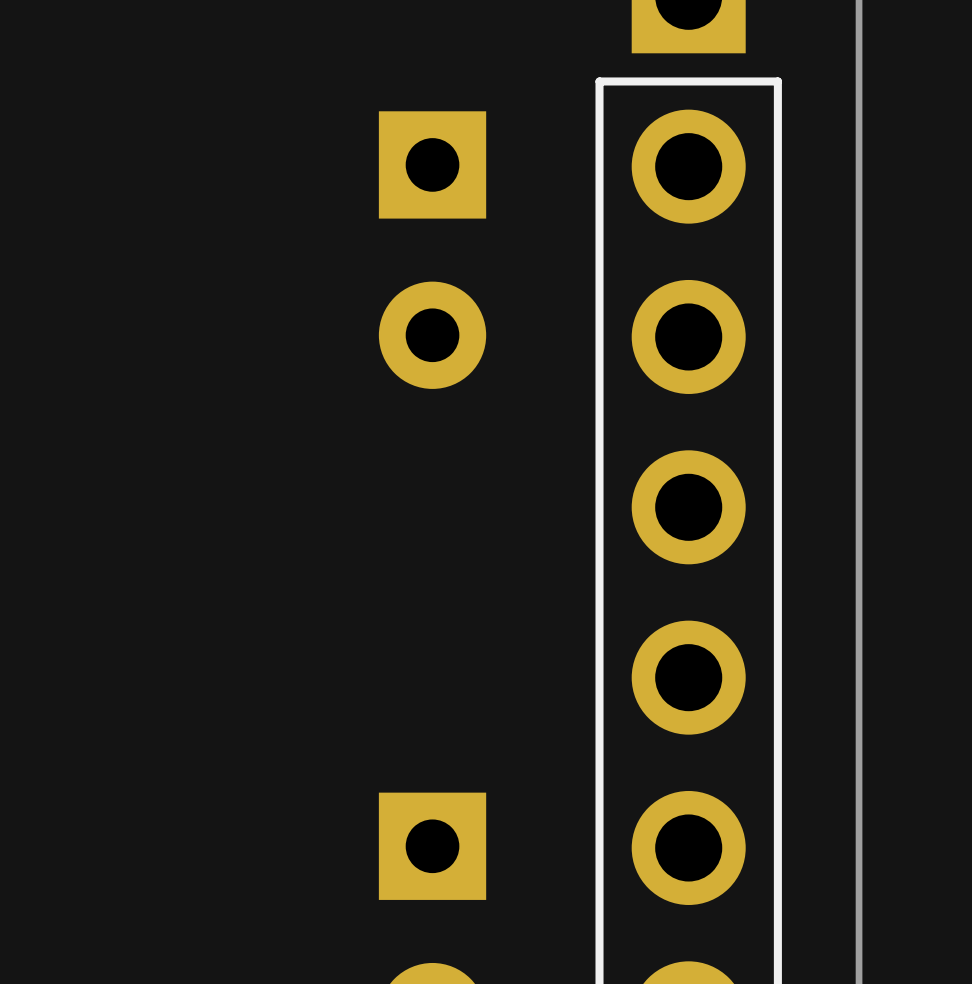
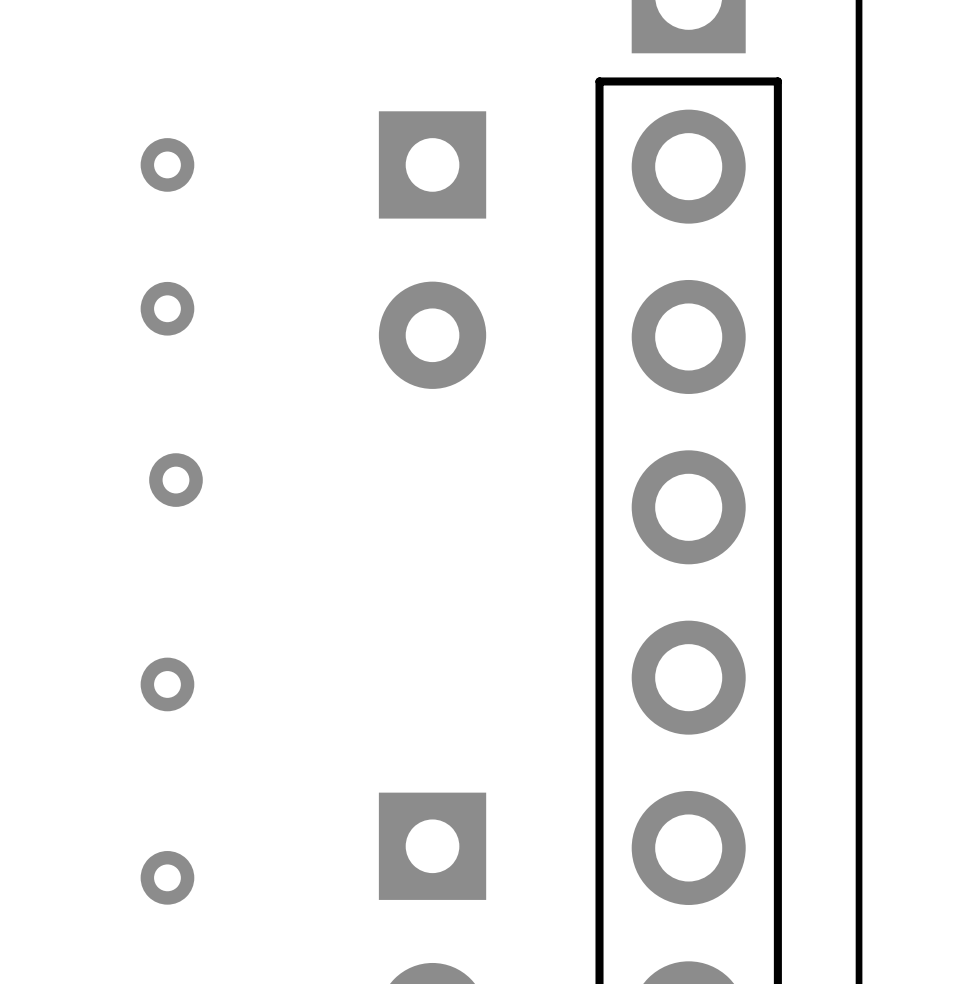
via: none -> (167, 164)
via: none -> (167, 308)
via: none -> (175, 480)
via: none -> (167, 684)
via: none -> (167, 877)

